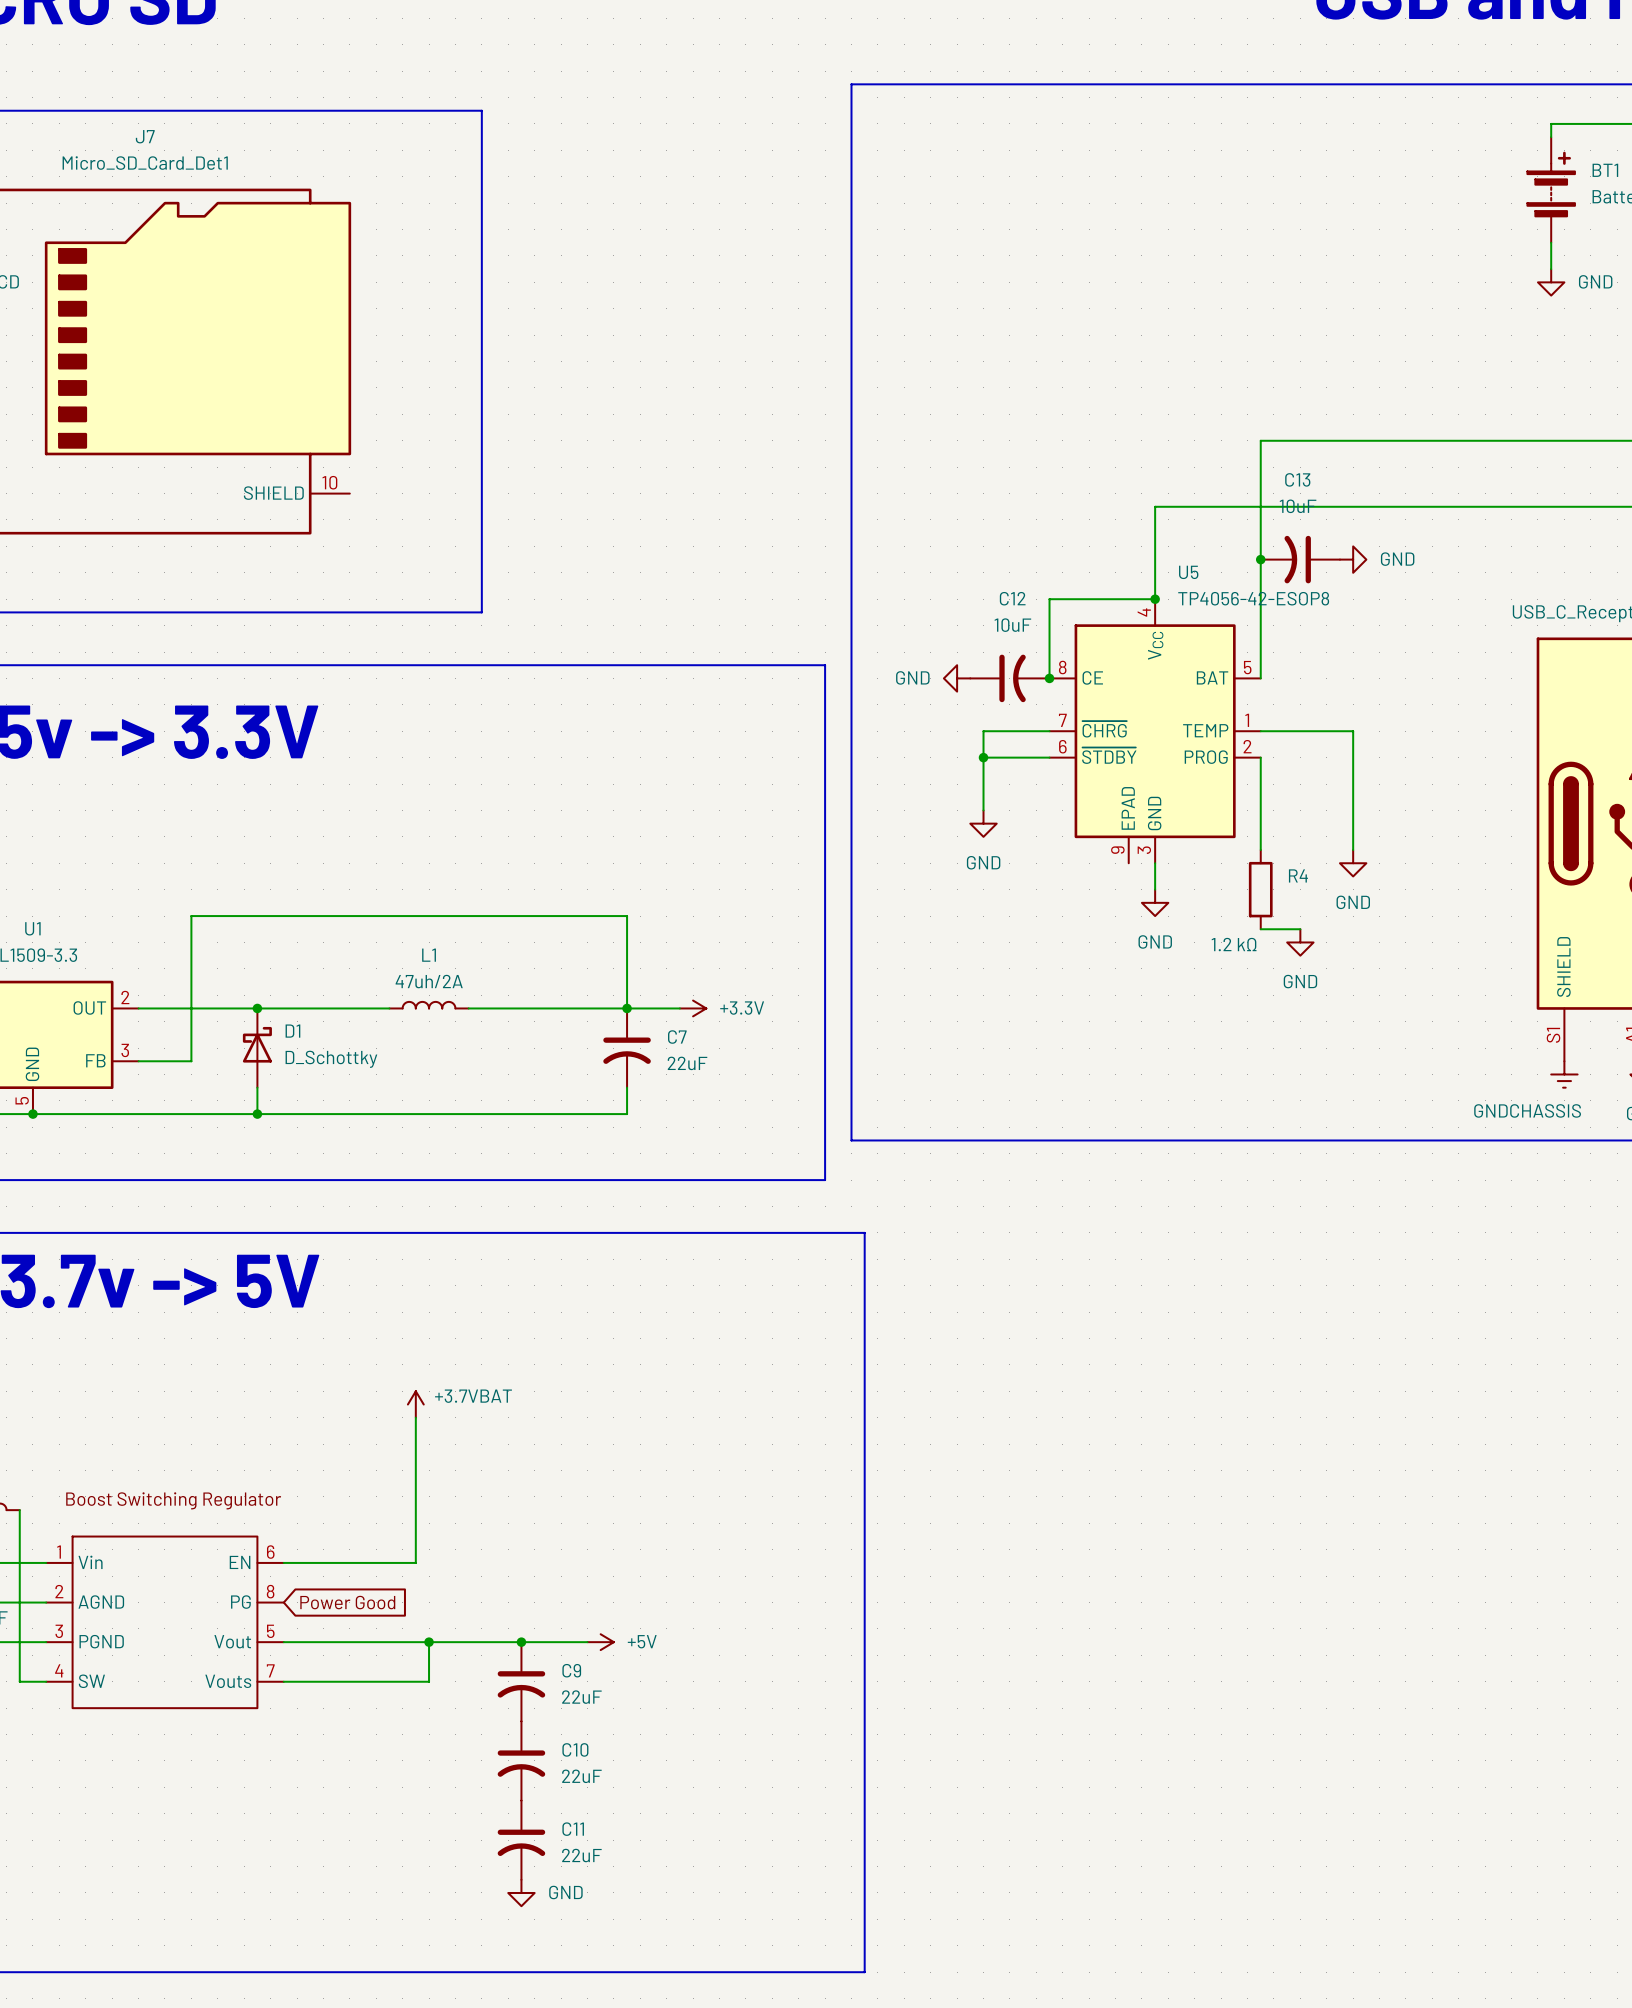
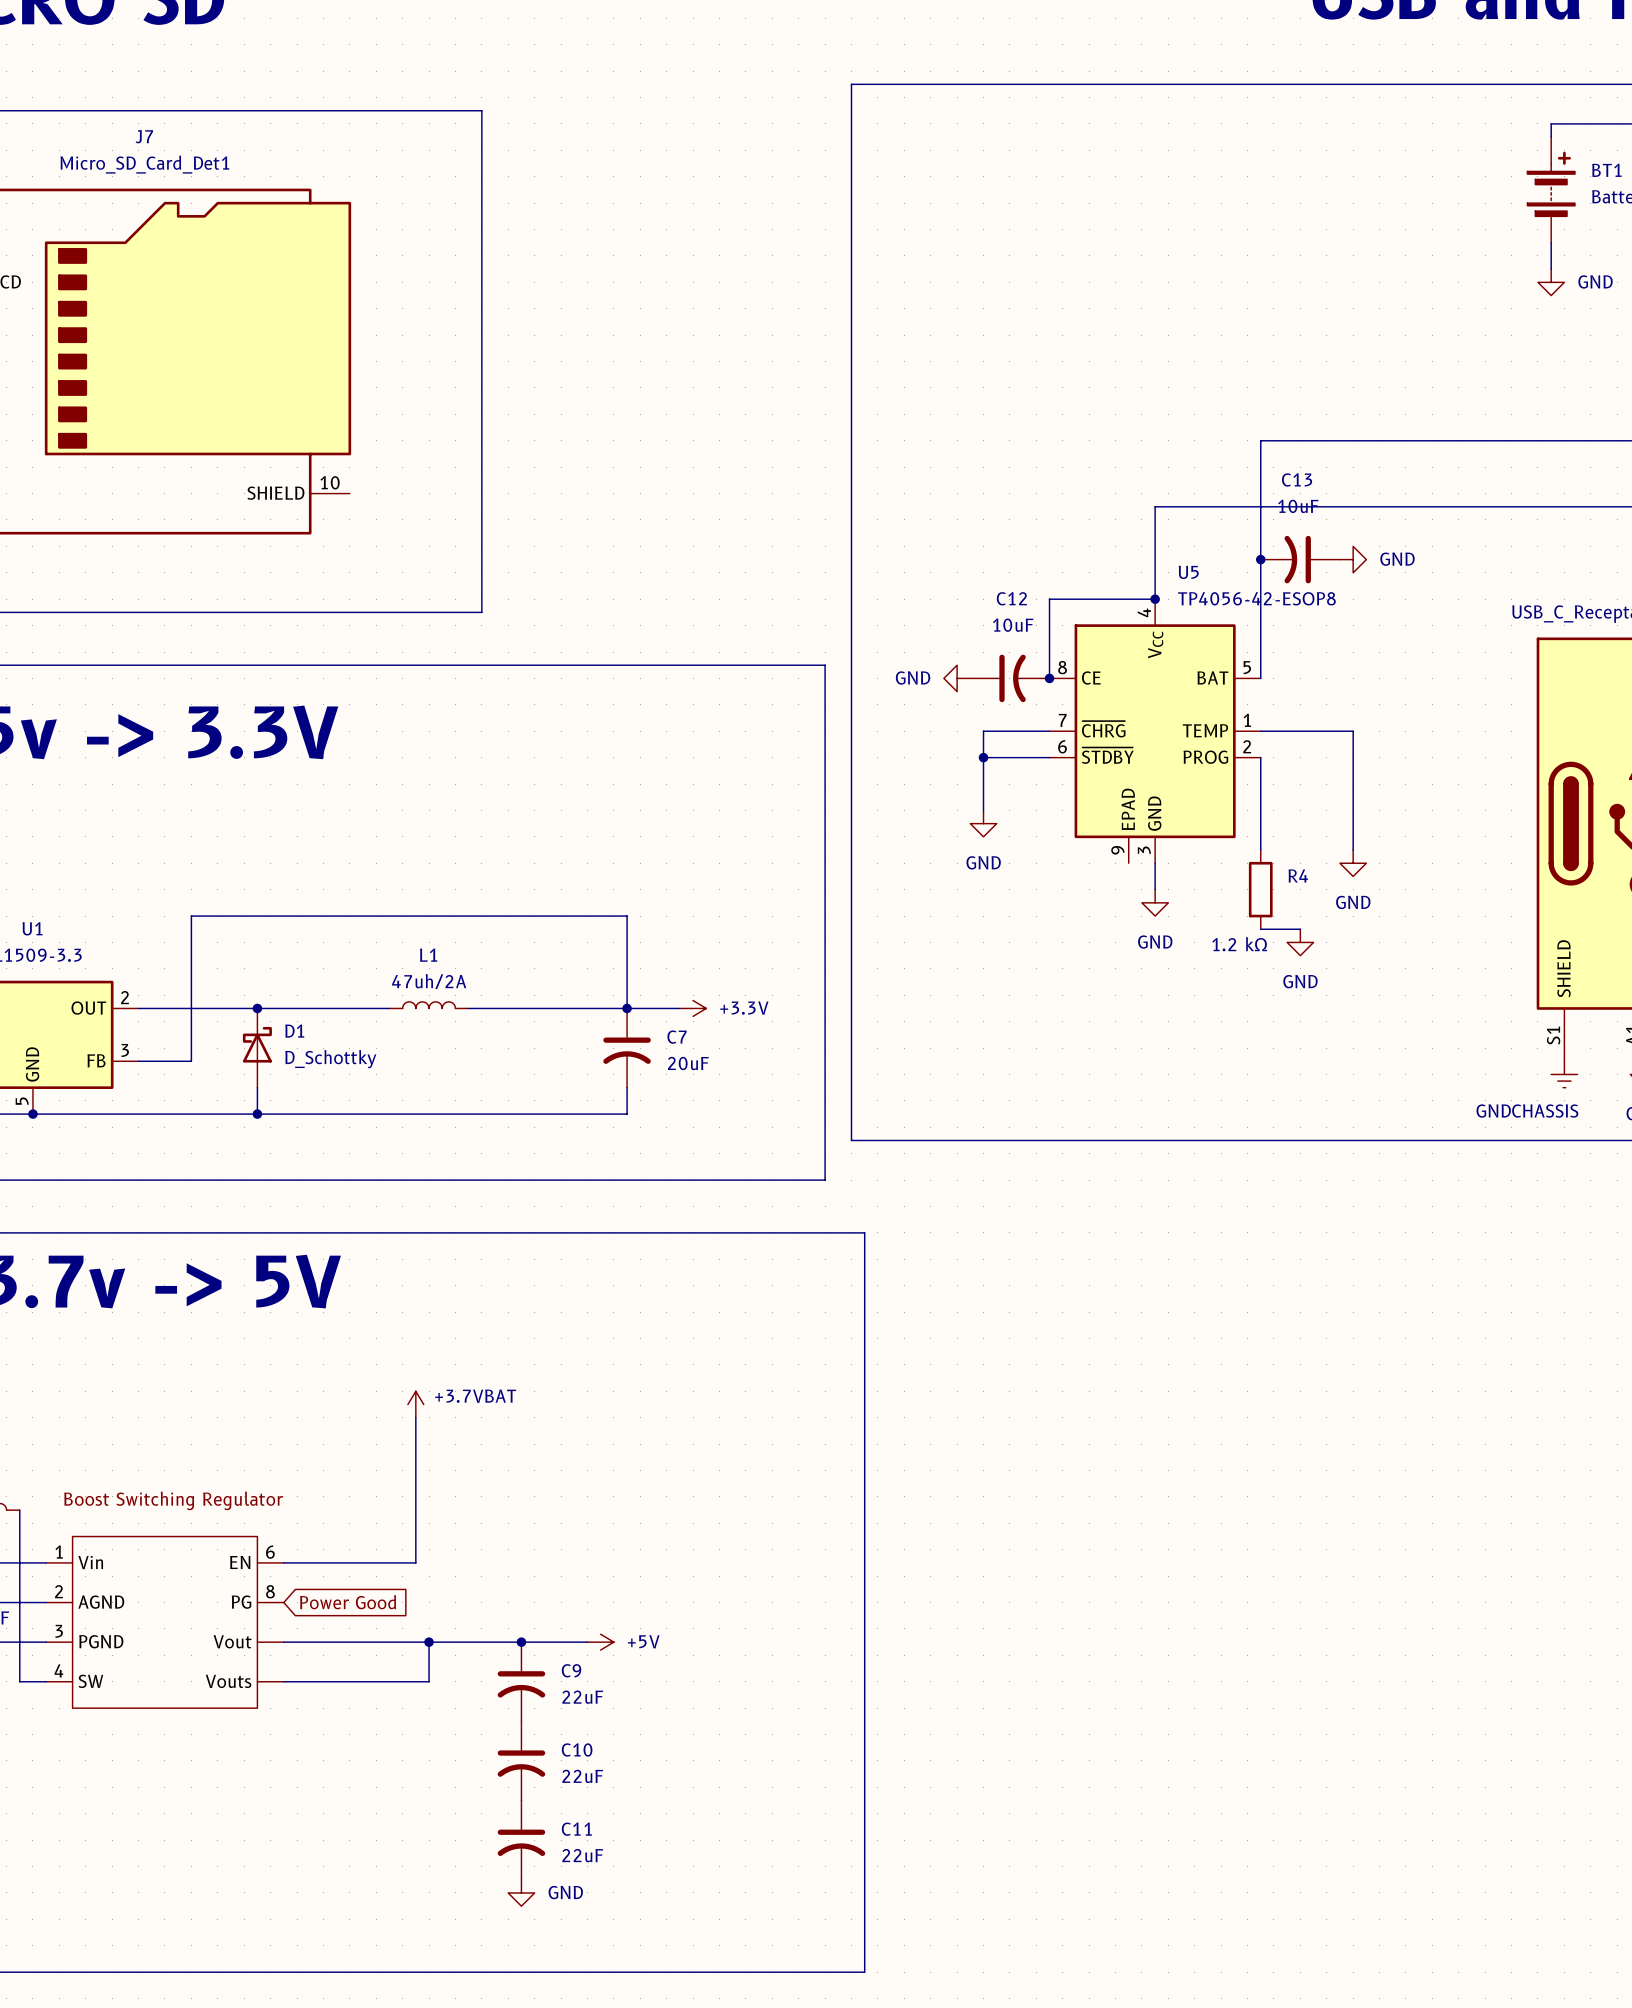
C7 value: 22uF (687, 1063) -> 20uF (688, 1063)
part pin number: 5 (270, 1631) -> none
part pin number: 7 (270, 1670) -> none

